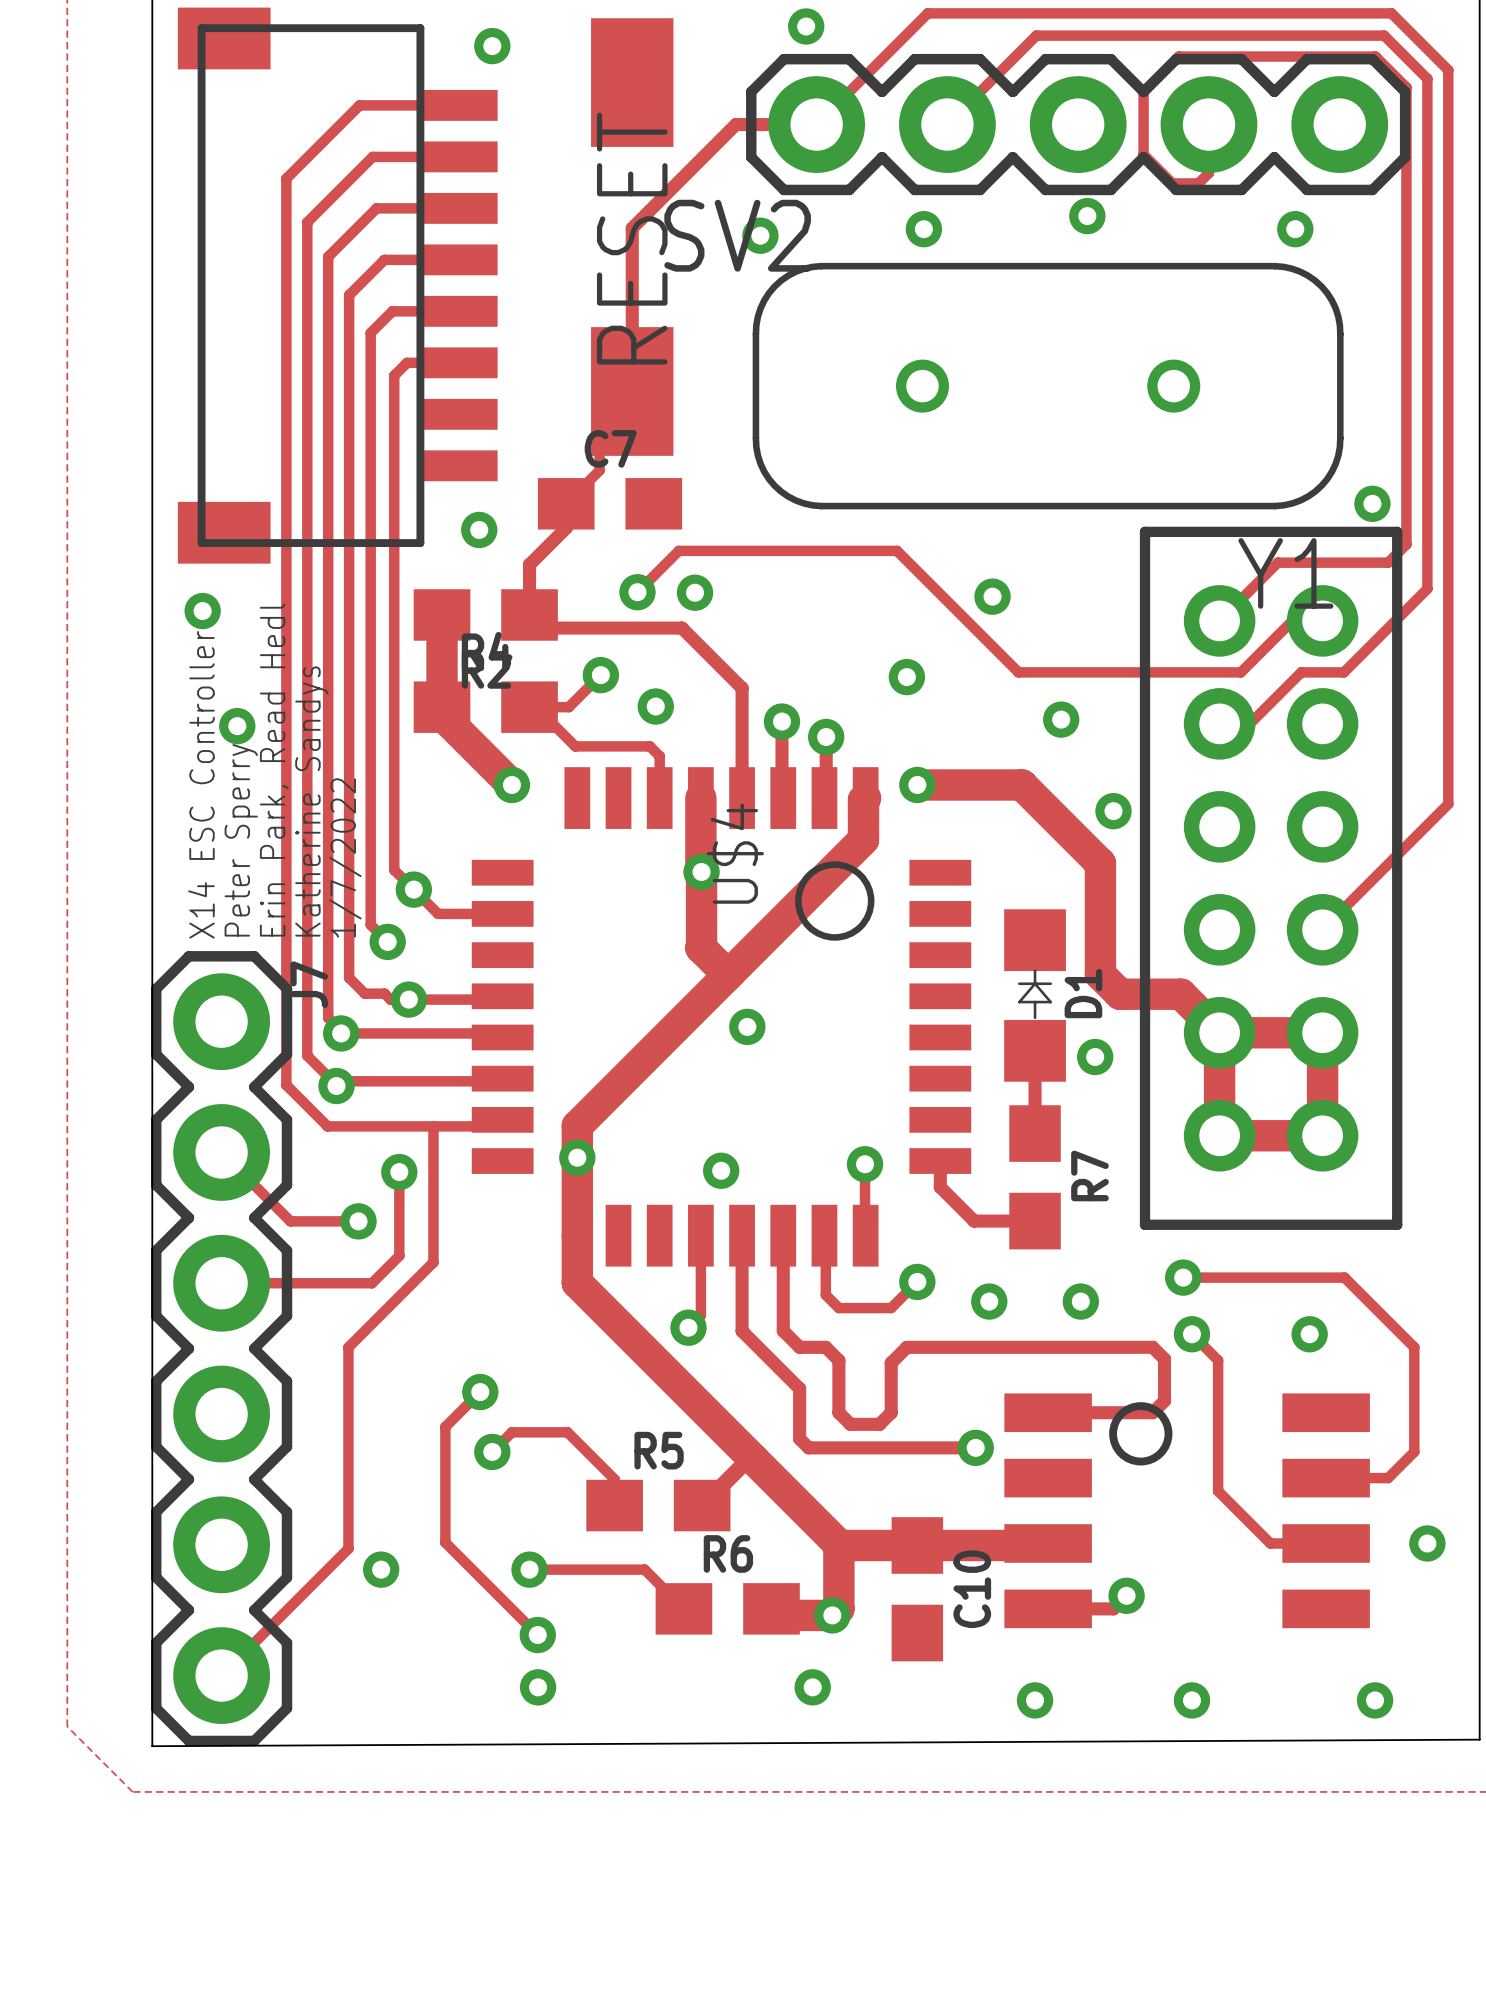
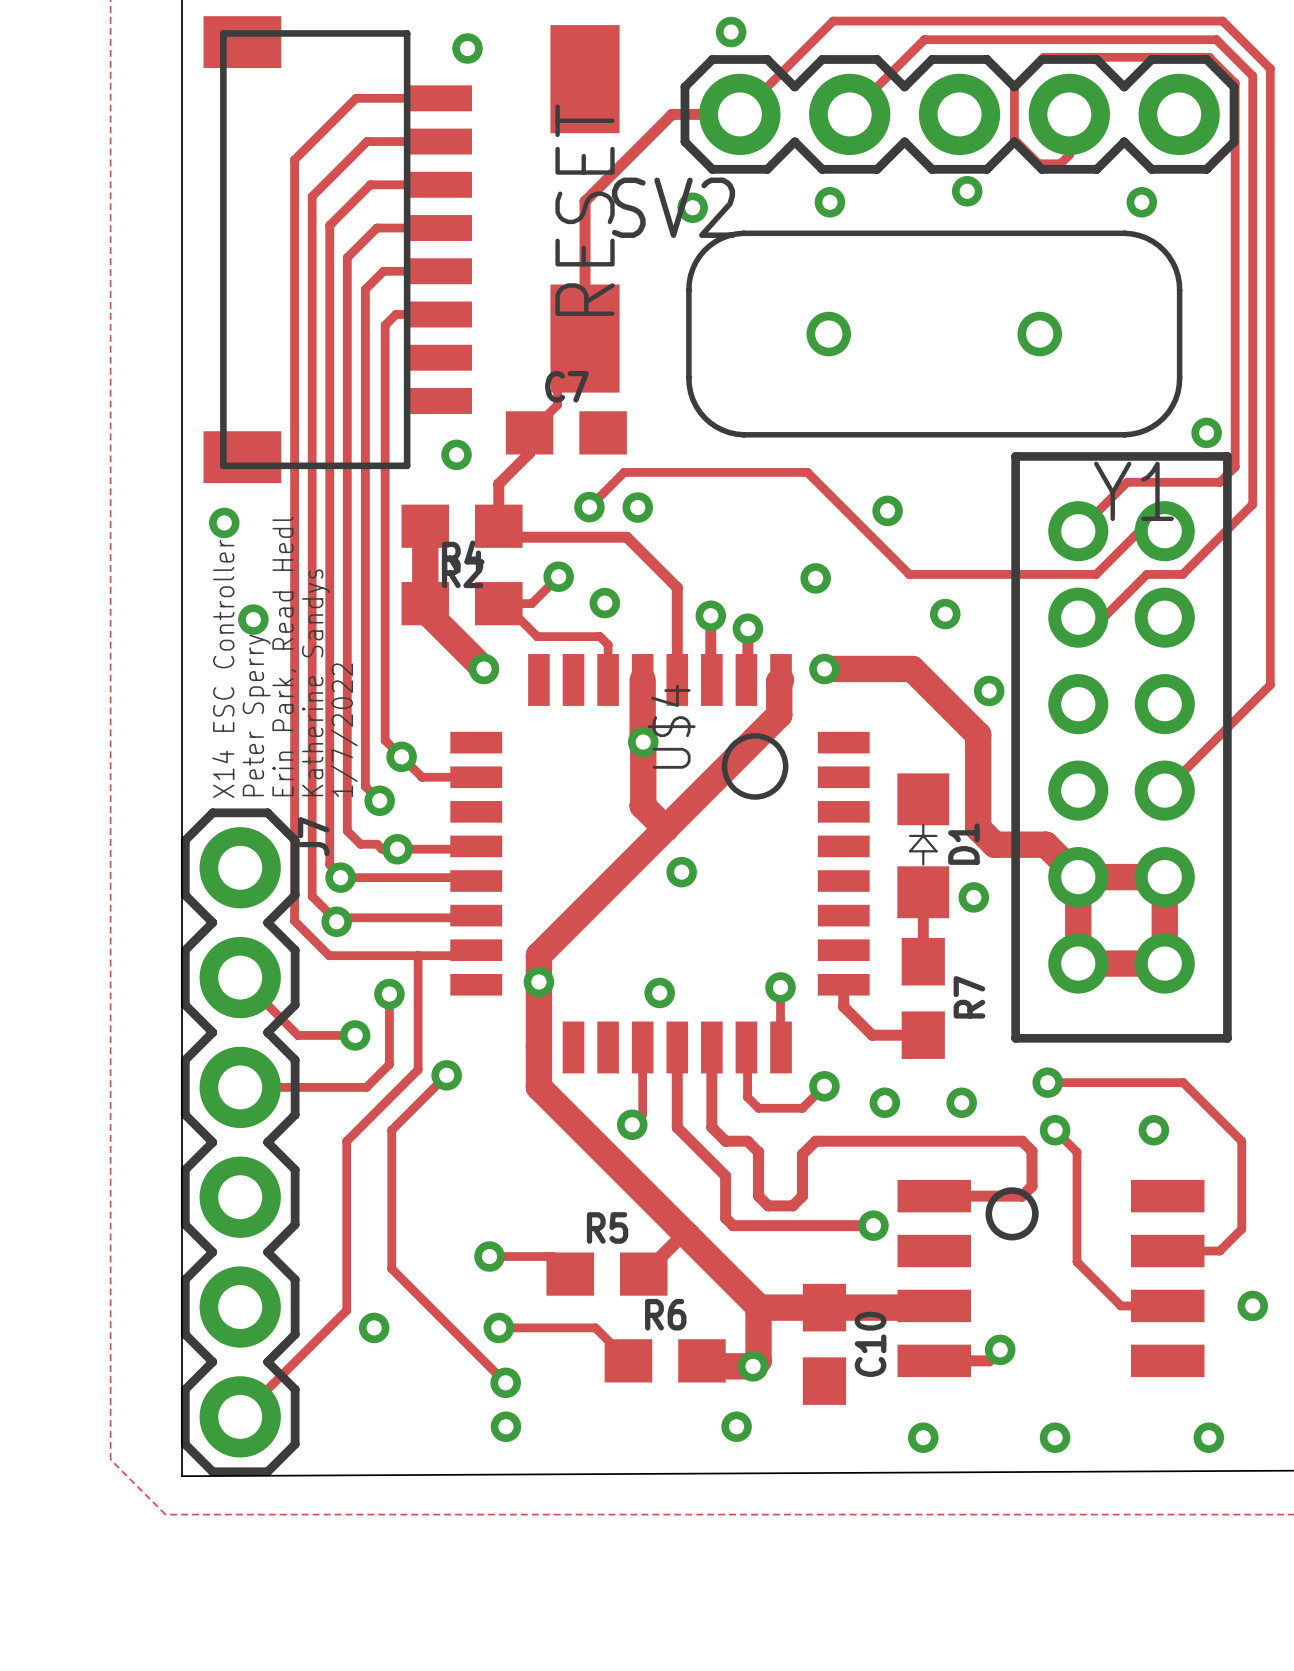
via: none -> (446, 1075)
track: (480, 1392) (445, 1426) (445, 1542) -> (446, 1075) (391, 1130) (391, 1268) (428, 1305)
via: (480, 1392) -> none
track: (492, 1451) (511, 1432) (567, 1432) (614, 1479) (614, 1505) -> (489, 1256) (552, 1256) (570, 1274)
via position: (492, 1451) -> (489, 1256)

